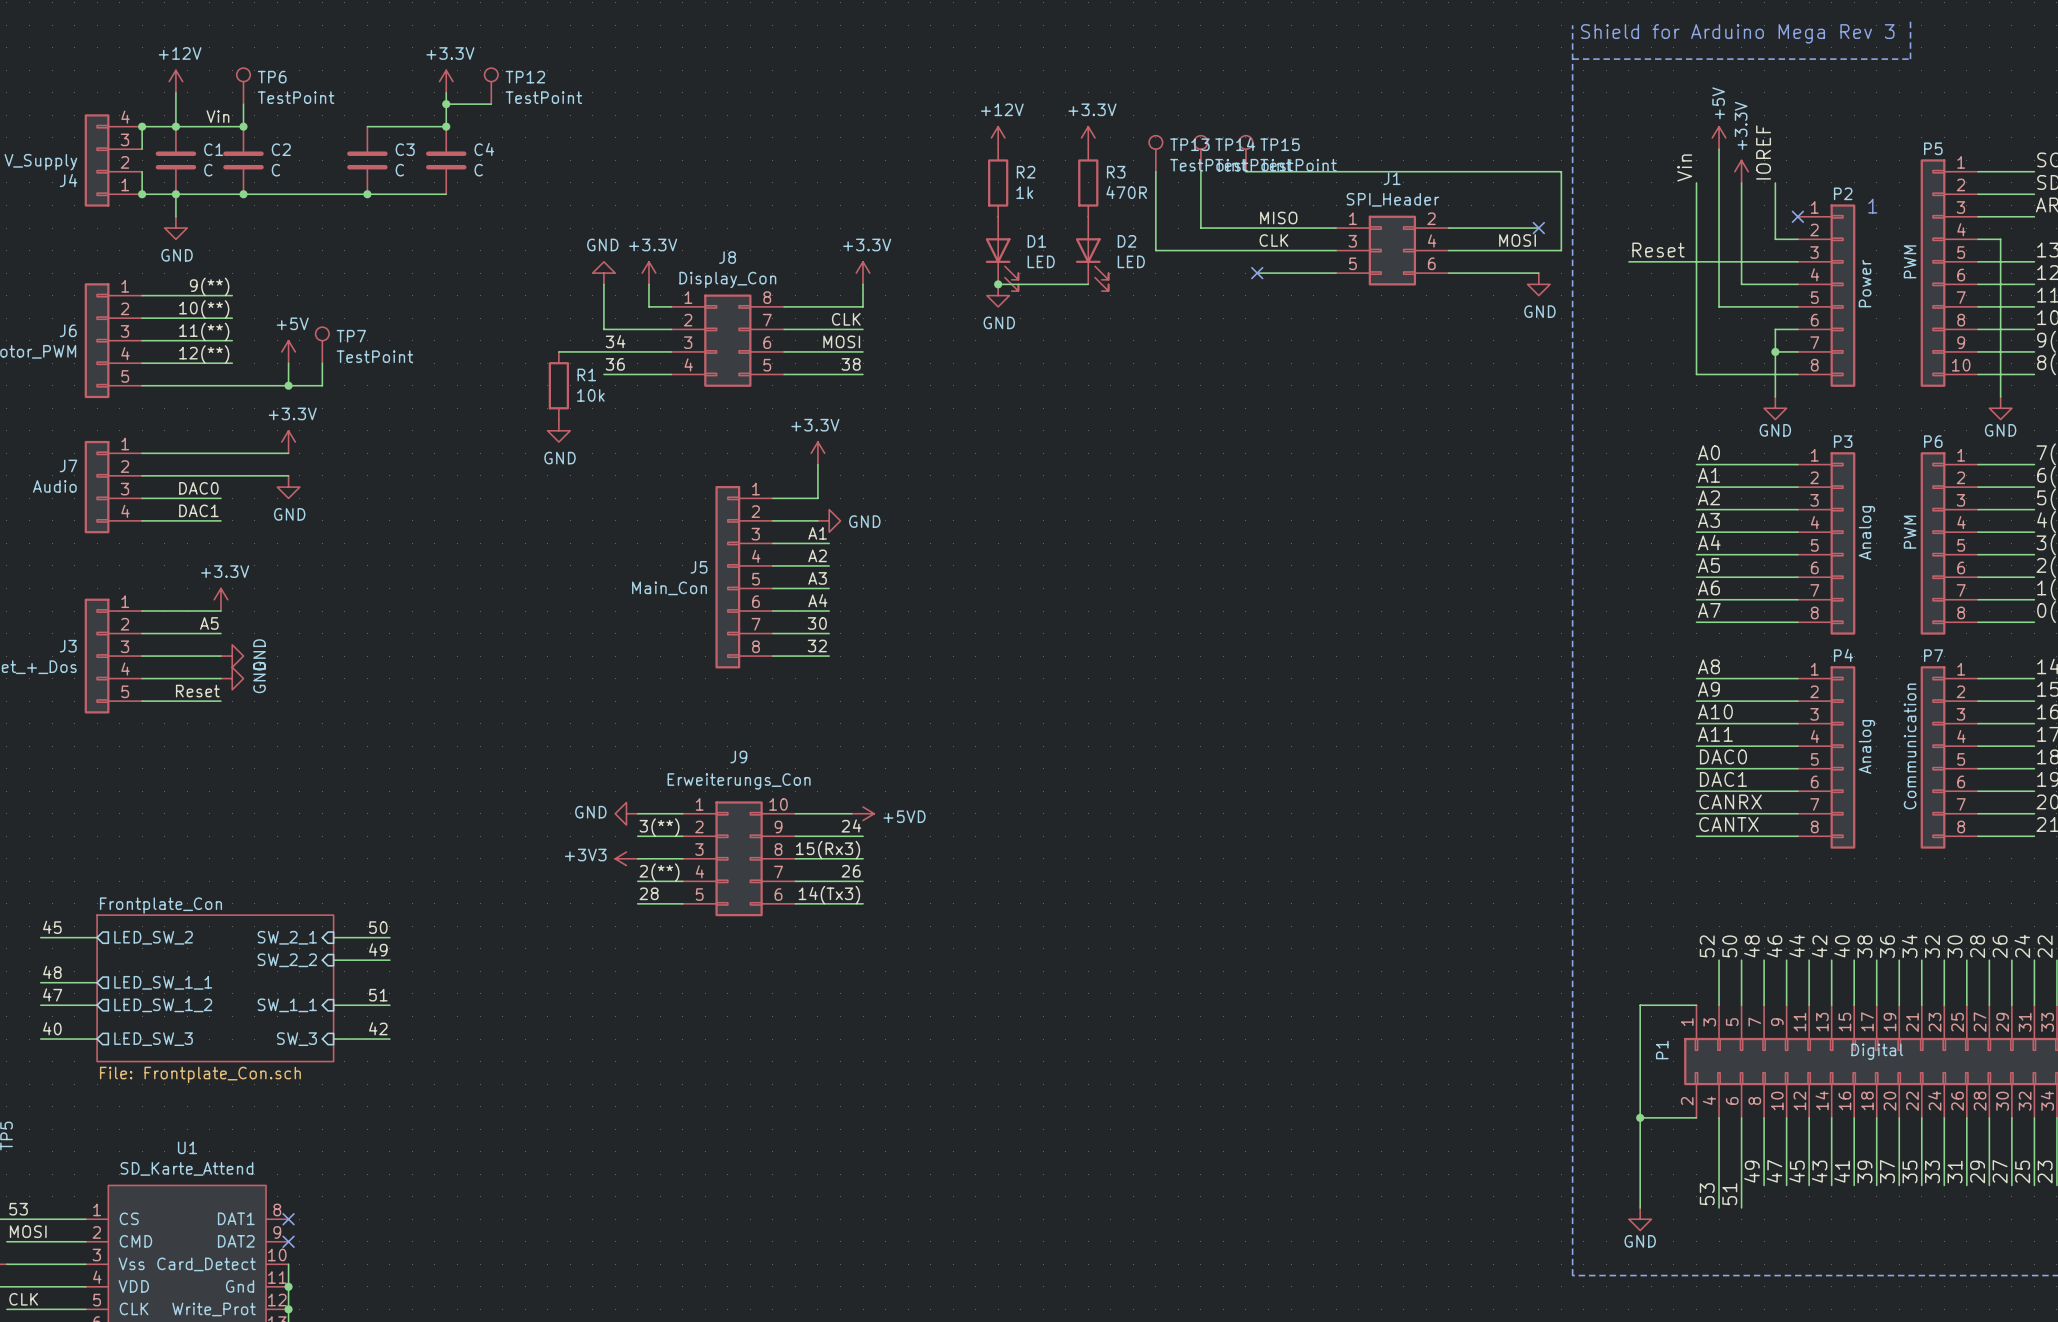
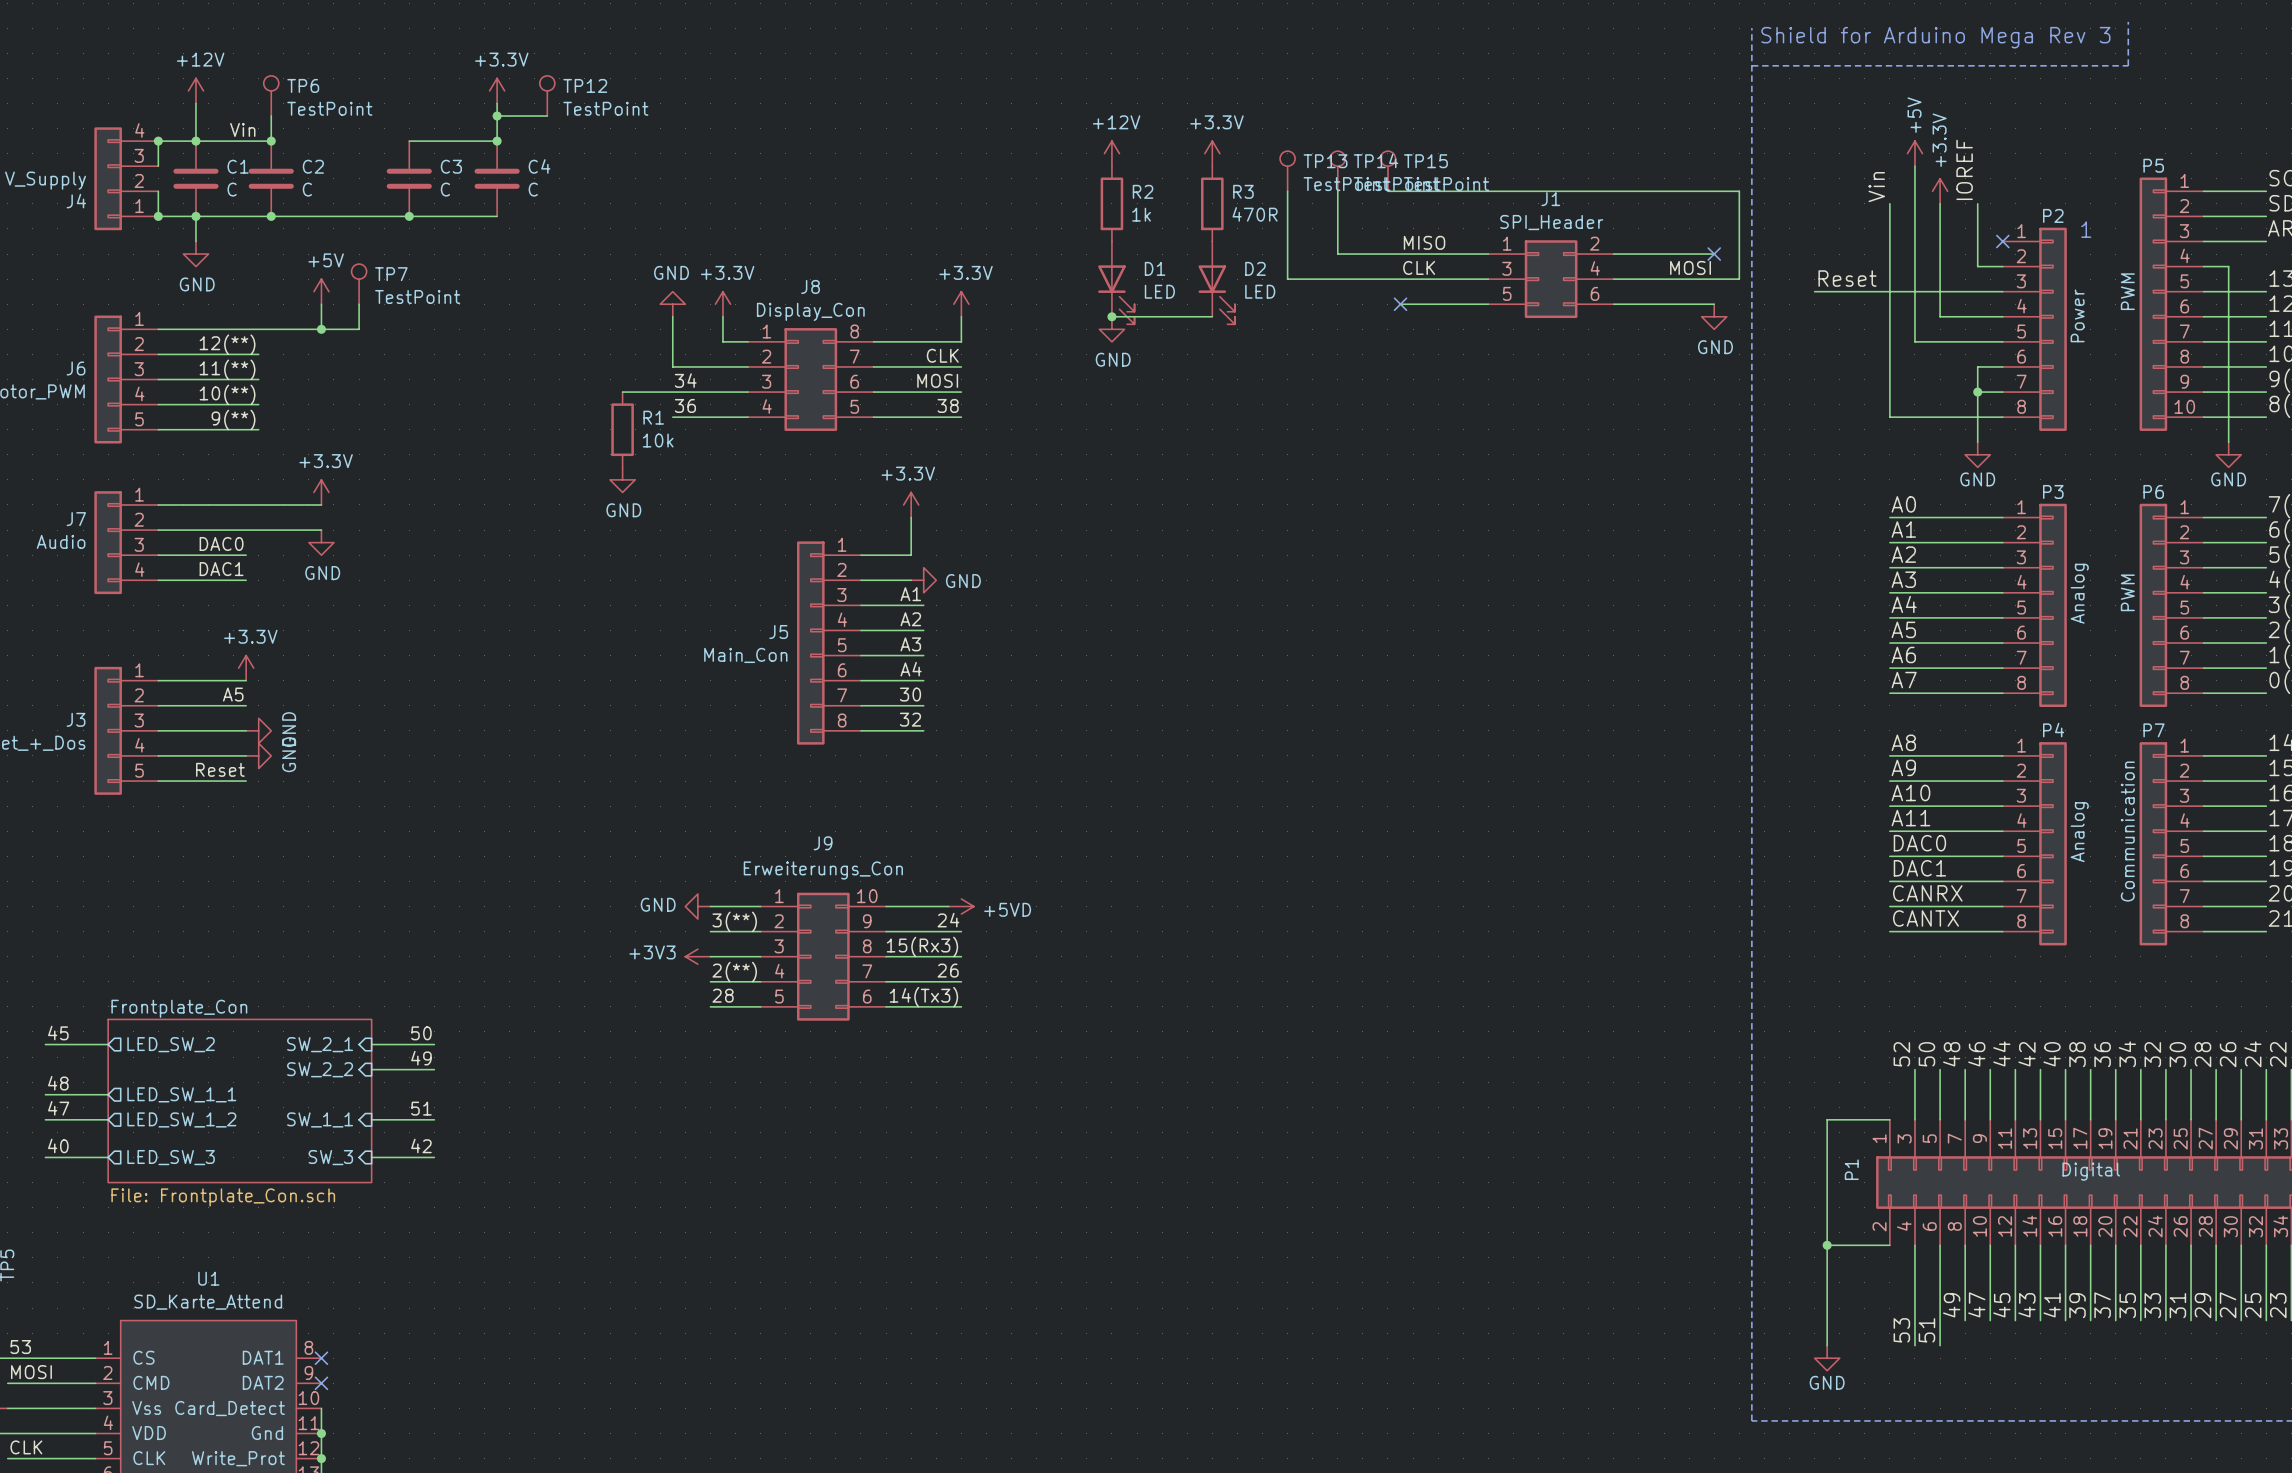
label position: 9(**) (209, 286) -> 9(**) (233, 420)
junction: none -> (321, 329)
label: 10(**) (204, 309) -> 12(**) (227, 344)
TP7 position: (322, 345) -> (359, 284)
power symbol position: +5V (288, 351) -> +5V (321, 291)
label: 12(**) (204, 354) -> 10(**) (227, 394)
wire: (288, 363) (288, 385) -> (321, 304) (321, 329)
wire: (322, 363) (322, 385) (232, 385) -> (359, 304) (359, 329) (258, 329)
junction: (288, 385) -> none

